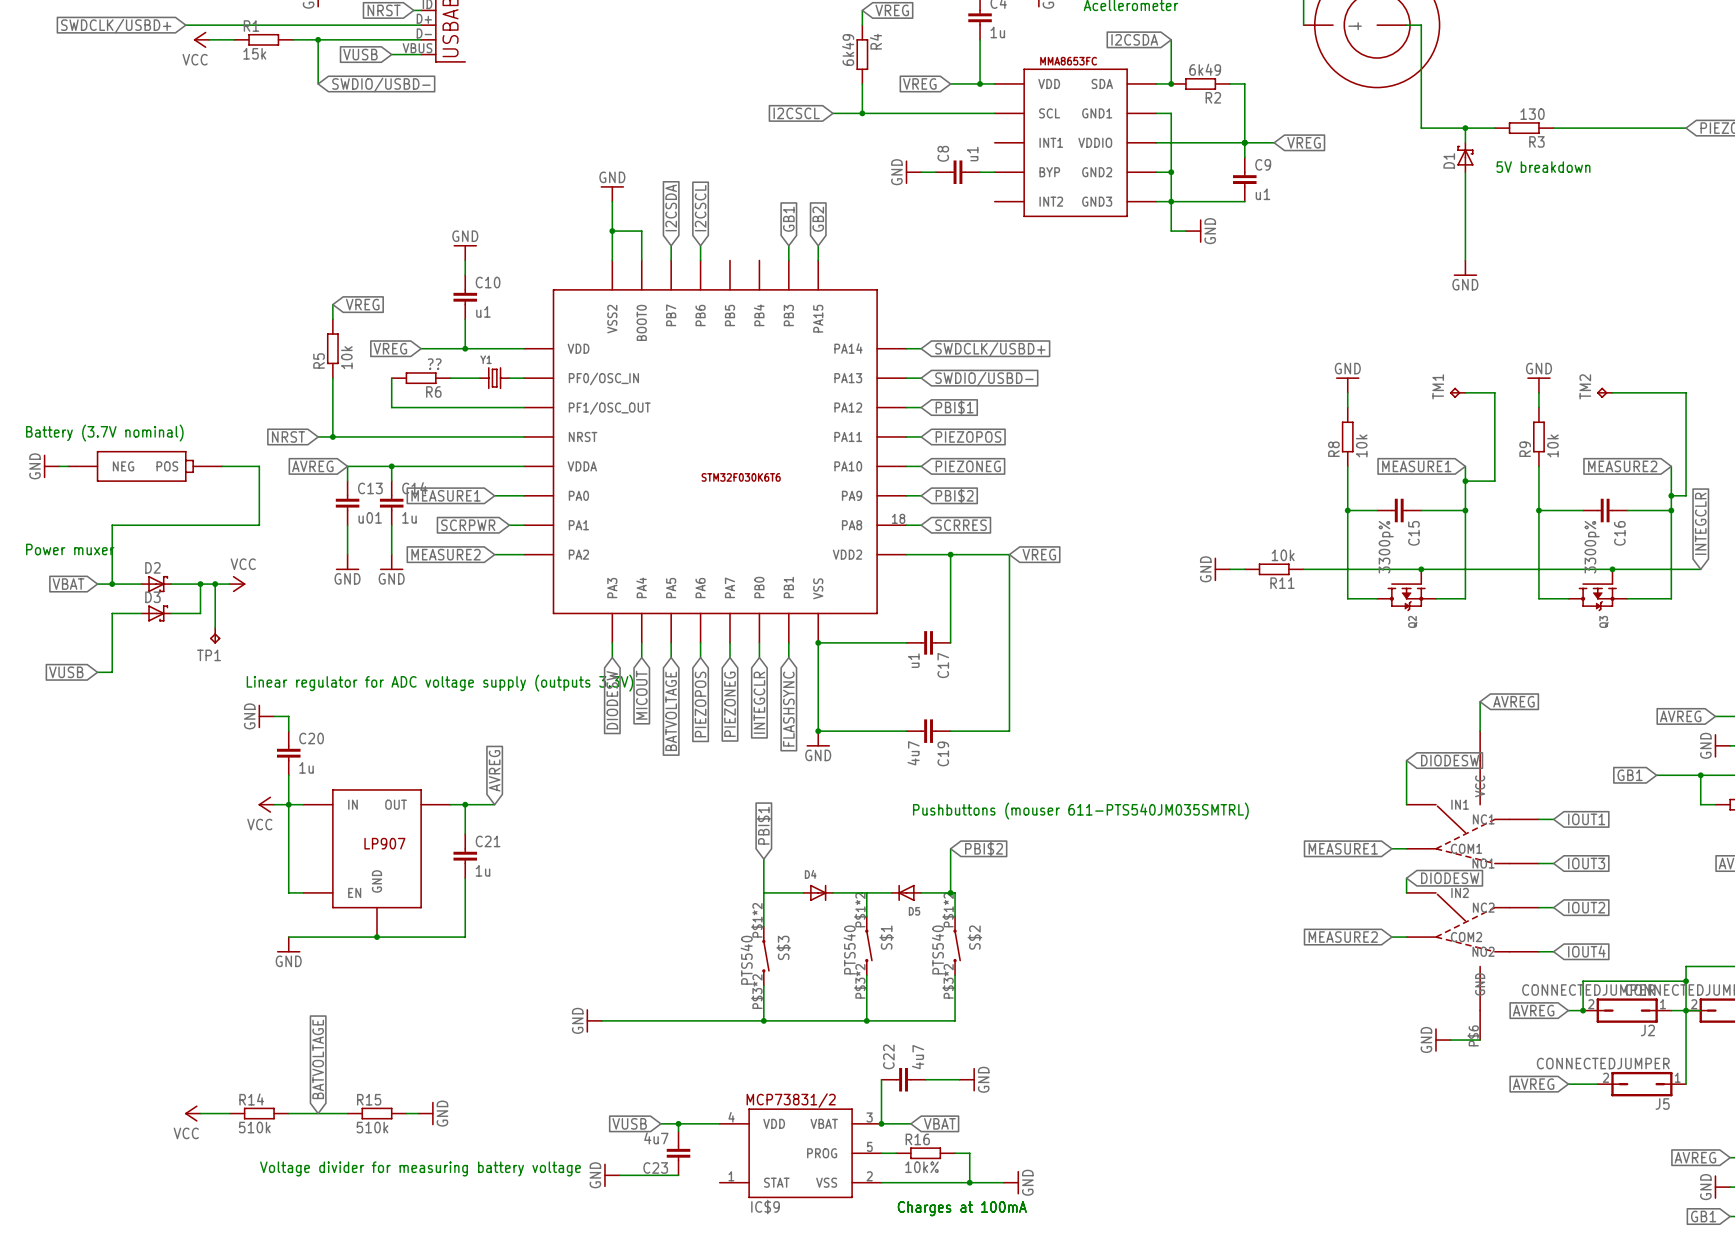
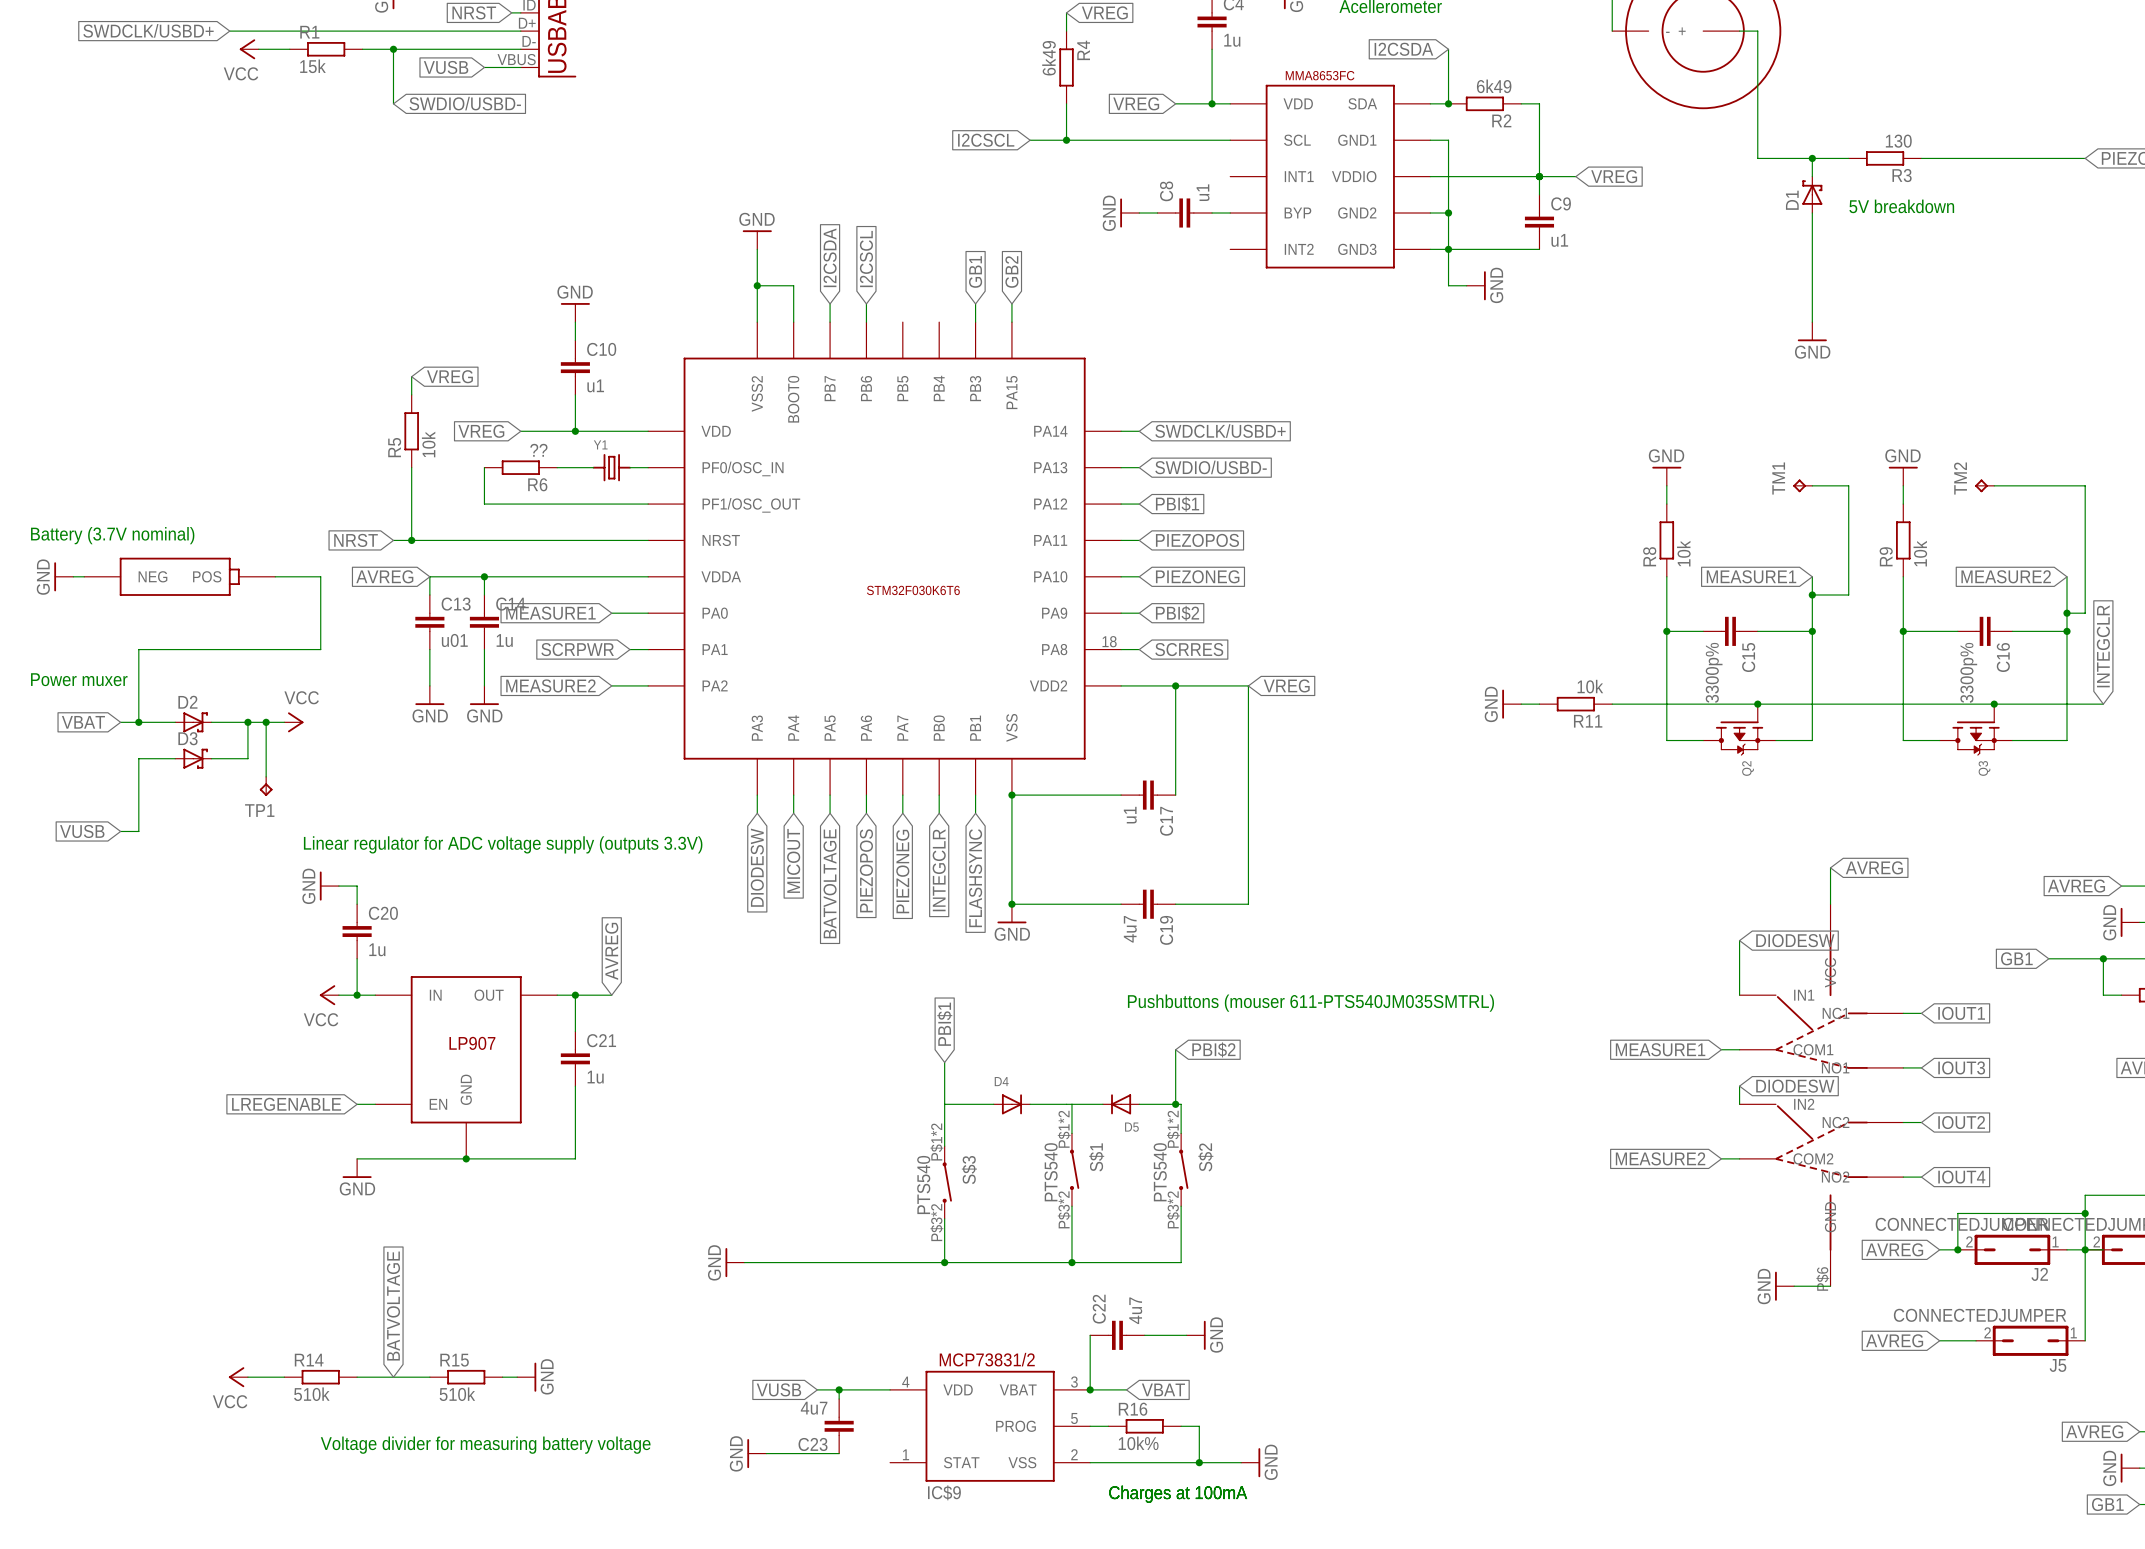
wire: (288, 804) (288, 892) -> none
global label: none -> LREGENABLE (286, 1104)

